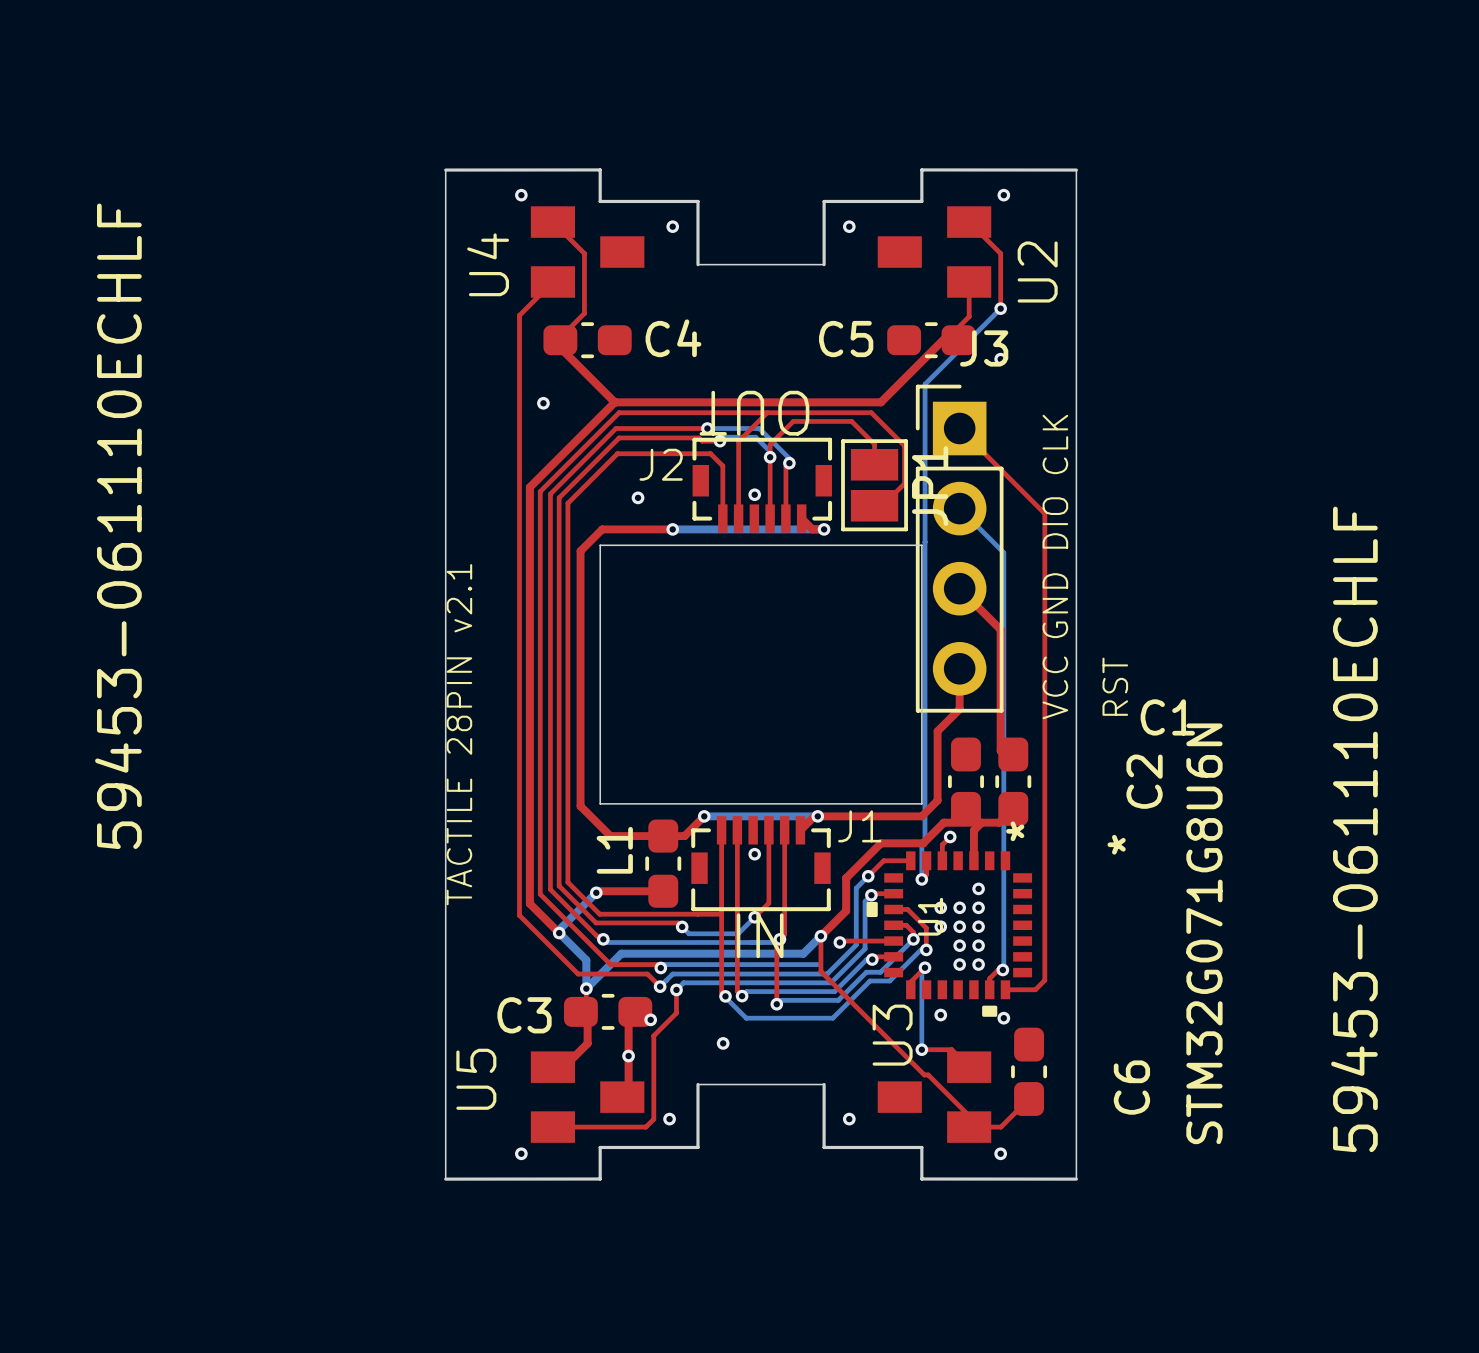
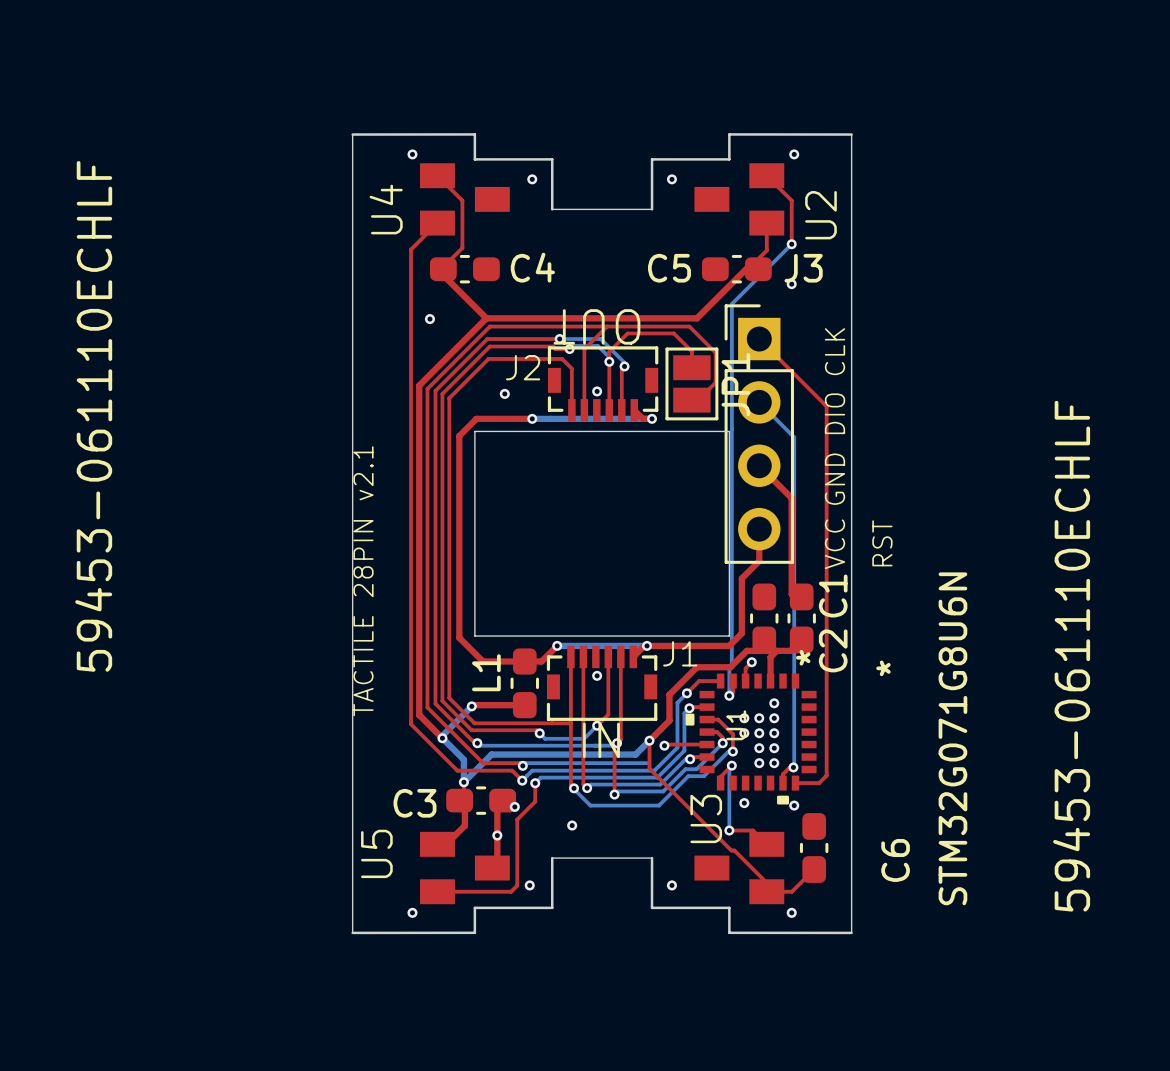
J3 name position: J3 (984, 348) -> J3 (803, 268)
C1 name rotation: 0° (1167, 717) -> 90° counterclockwise (833, 596)
C1 name position: C1 (1167, 717) -> C1 (833, 596)
C2 name position: C2 (1144, 781) -> C2 (833, 650)

